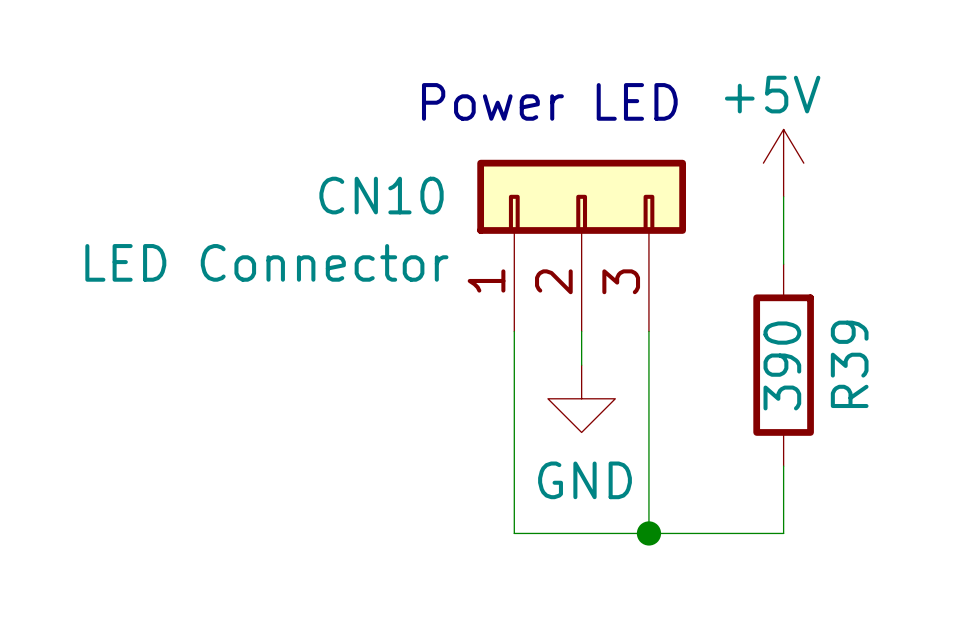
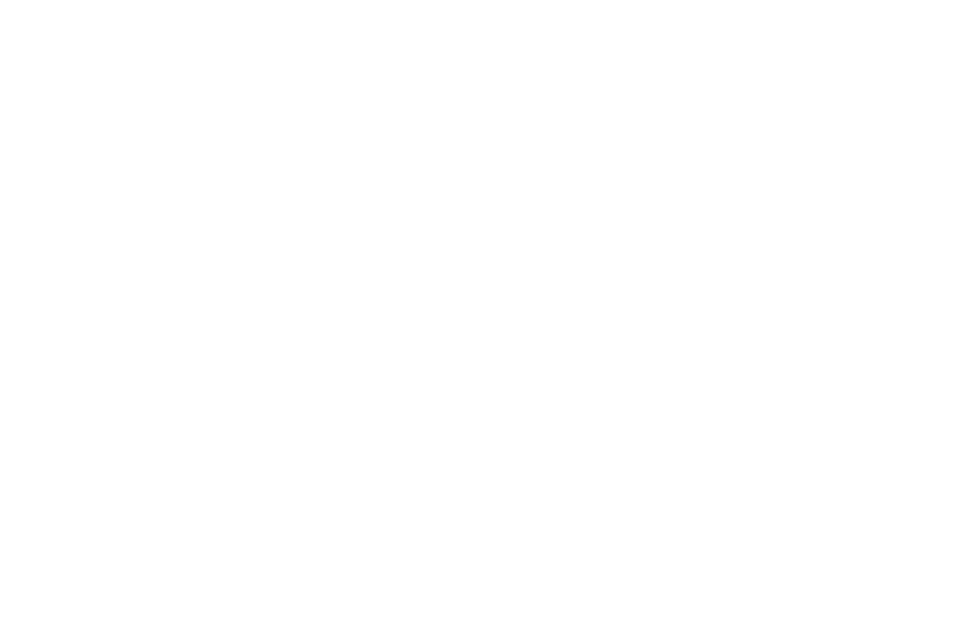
text: Power LED (549, 101) -> none
power symbol: +5V (783, 163) -> none
wire: (783, 196) (783, 264) -> none
CN10: LED Connector (581, 245) -> none
wire: (514, 331) (514, 533) (783, 533) (783, 466) -> none
wire: (581, 331) (581, 365) -> none
wire: (648, 331) (648, 533) -> none
R39: 390 (783, 365) -> none
power symbol: GND (581, 398) -> none
junction: (648, 533) -> none

